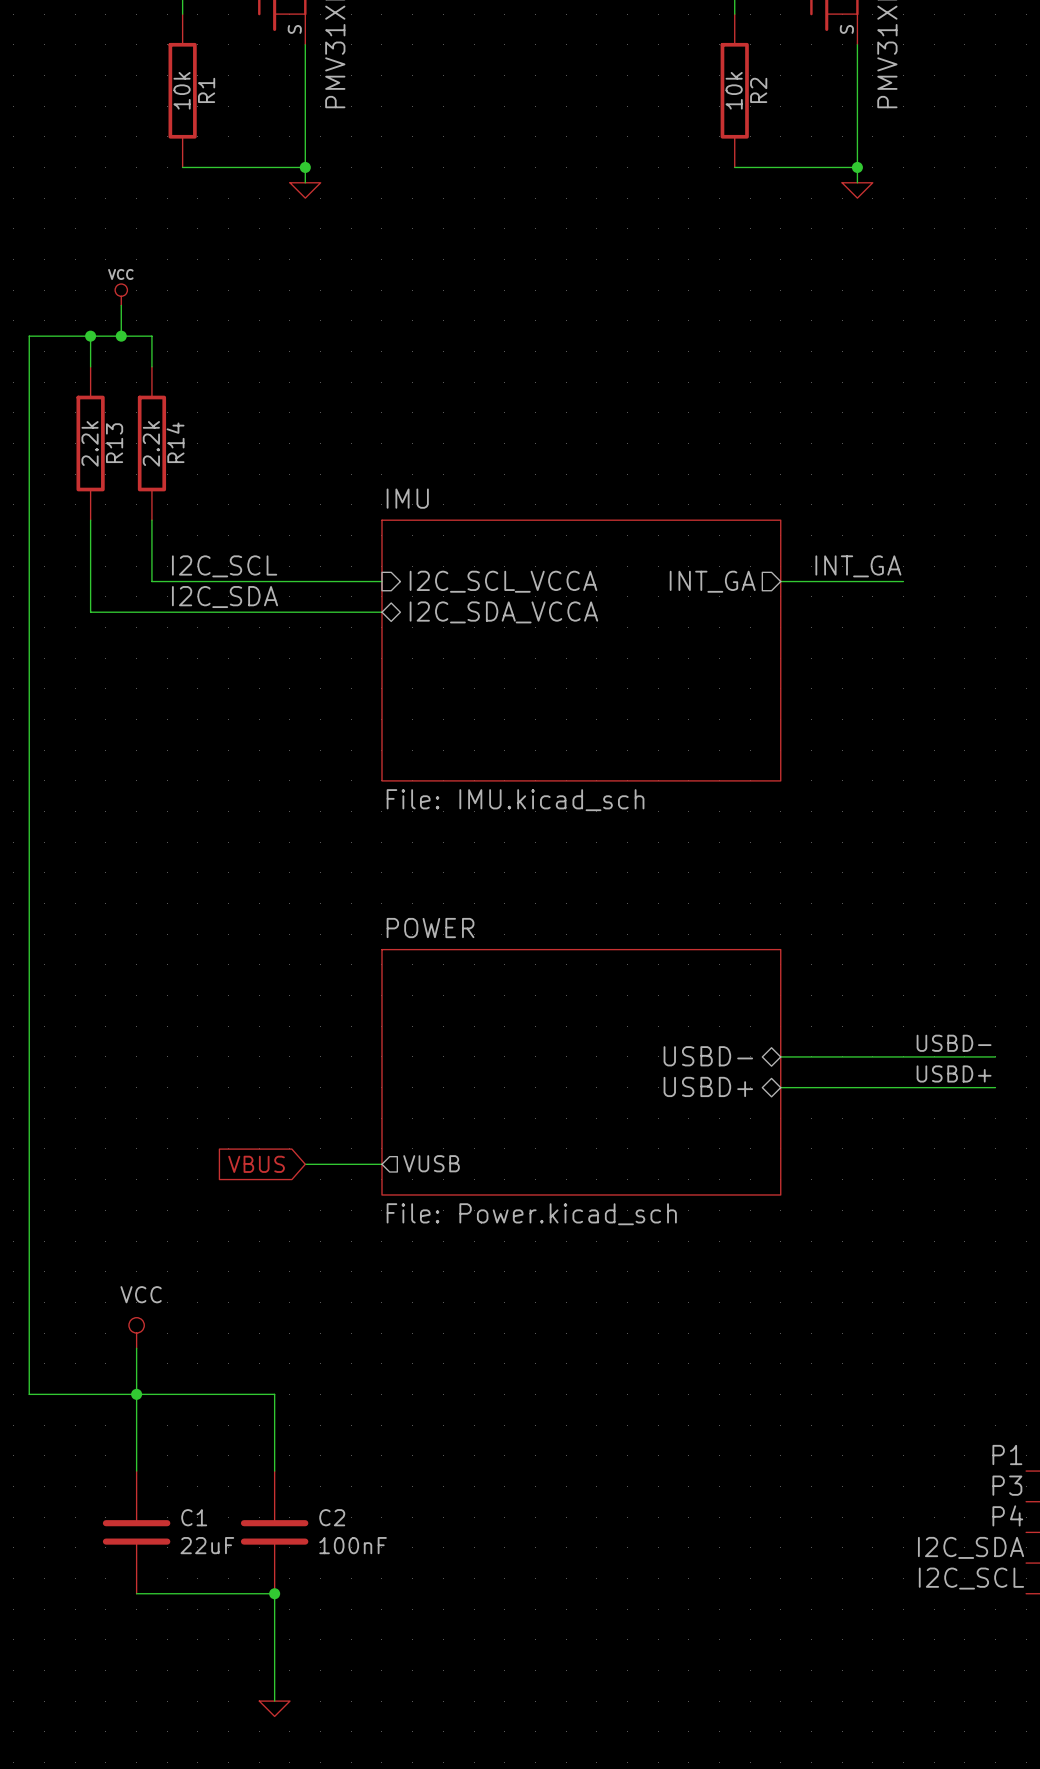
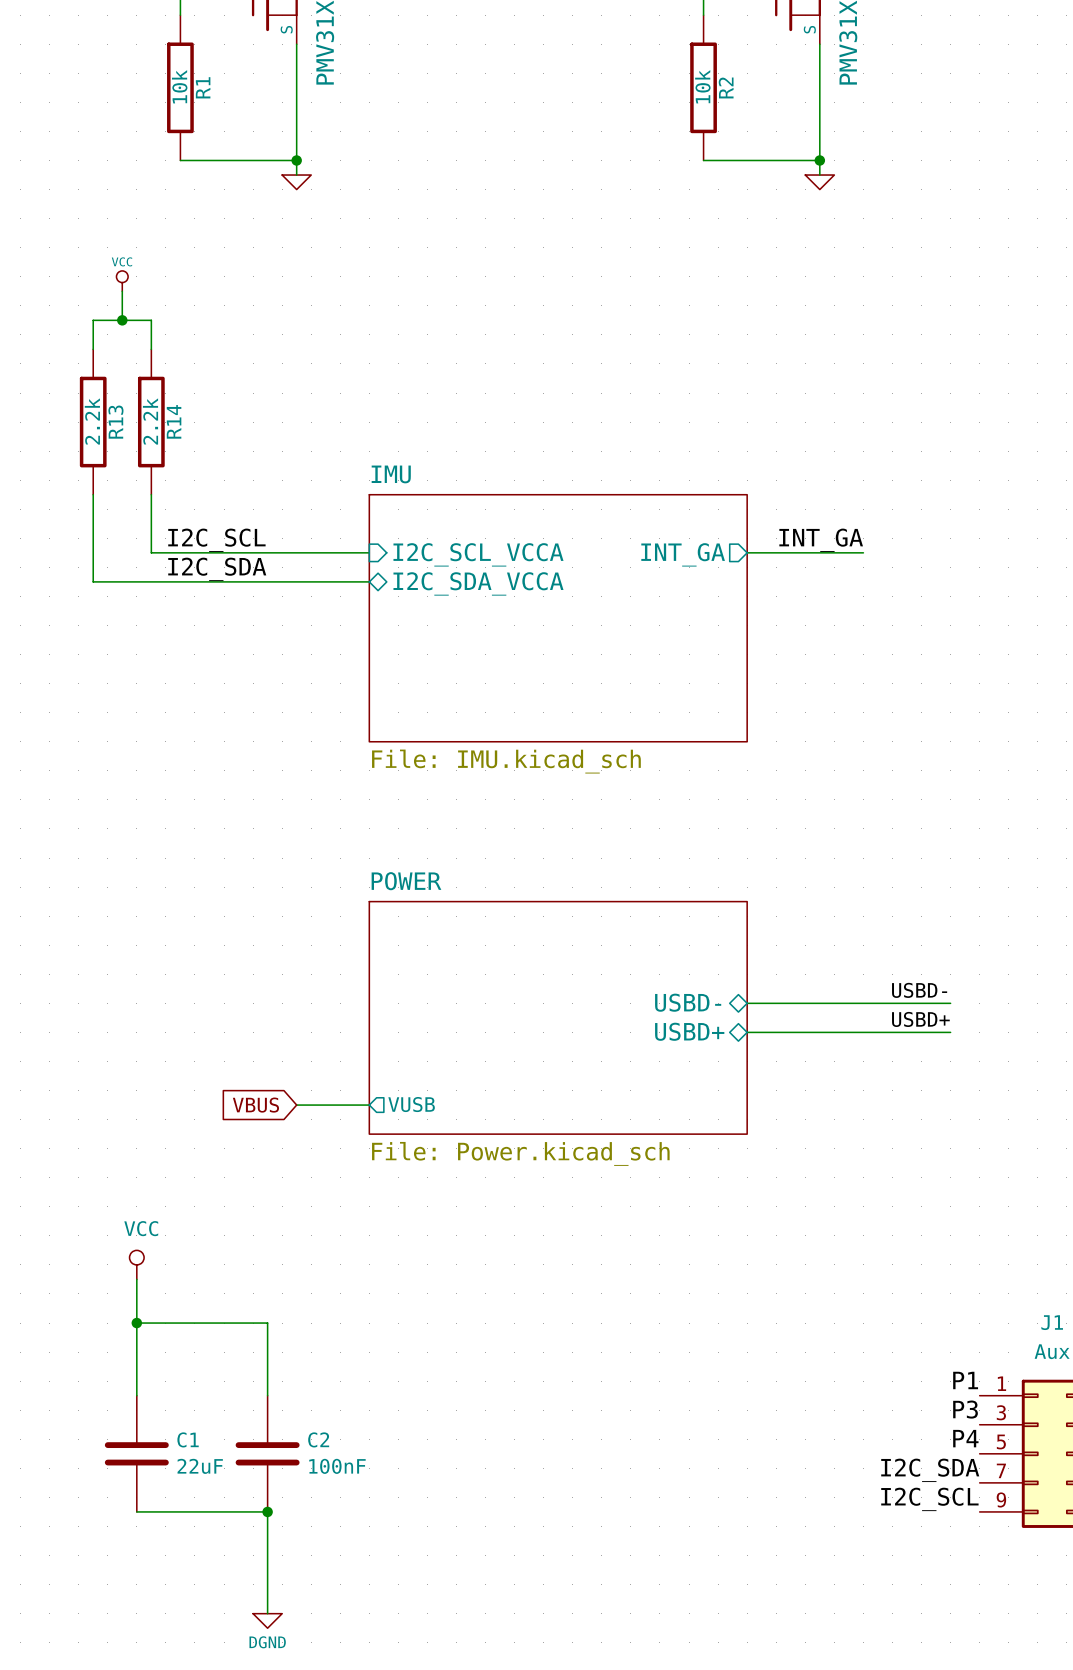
wire: (90, 336) (29, 336) (29, 1394) (136, 1394) -> none
junction: (90, 336) -> none
power symbol text: none -> DGND (267, 1642)

